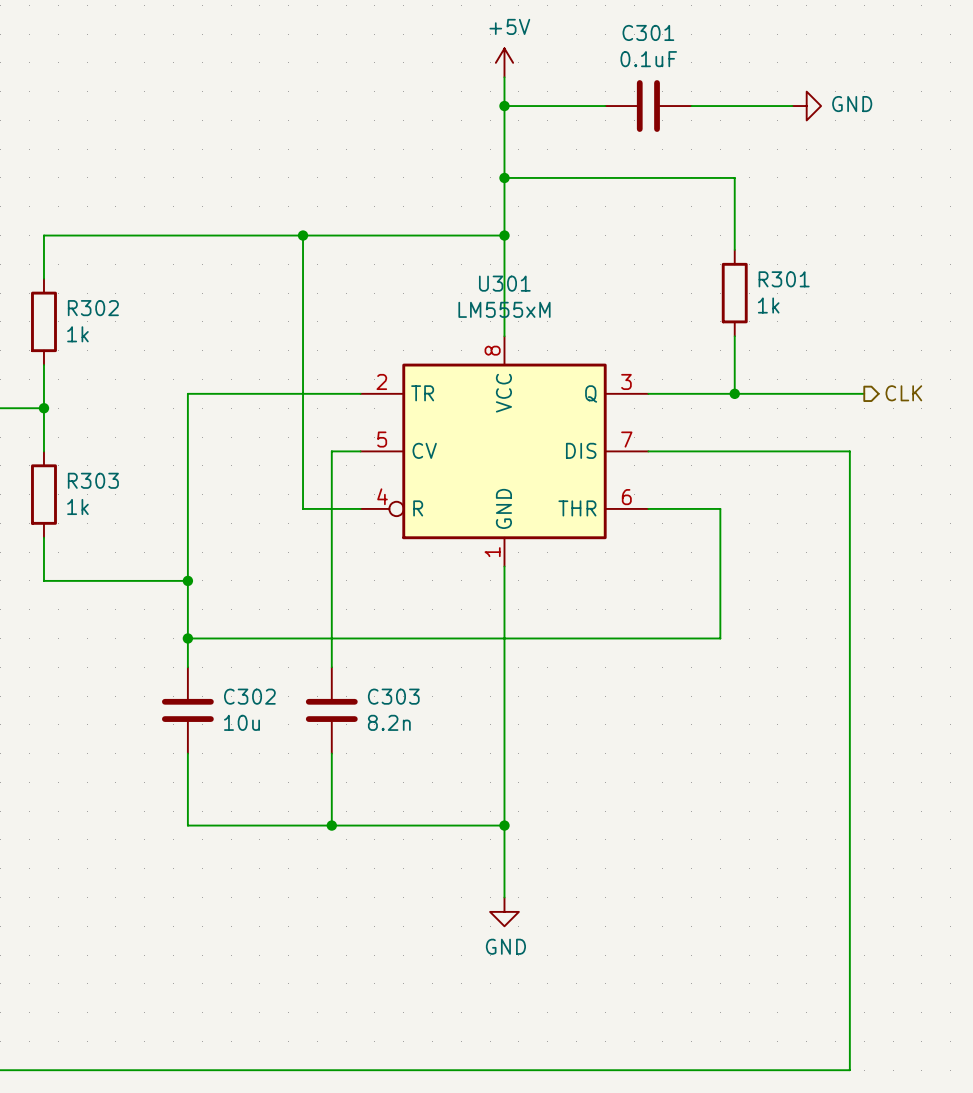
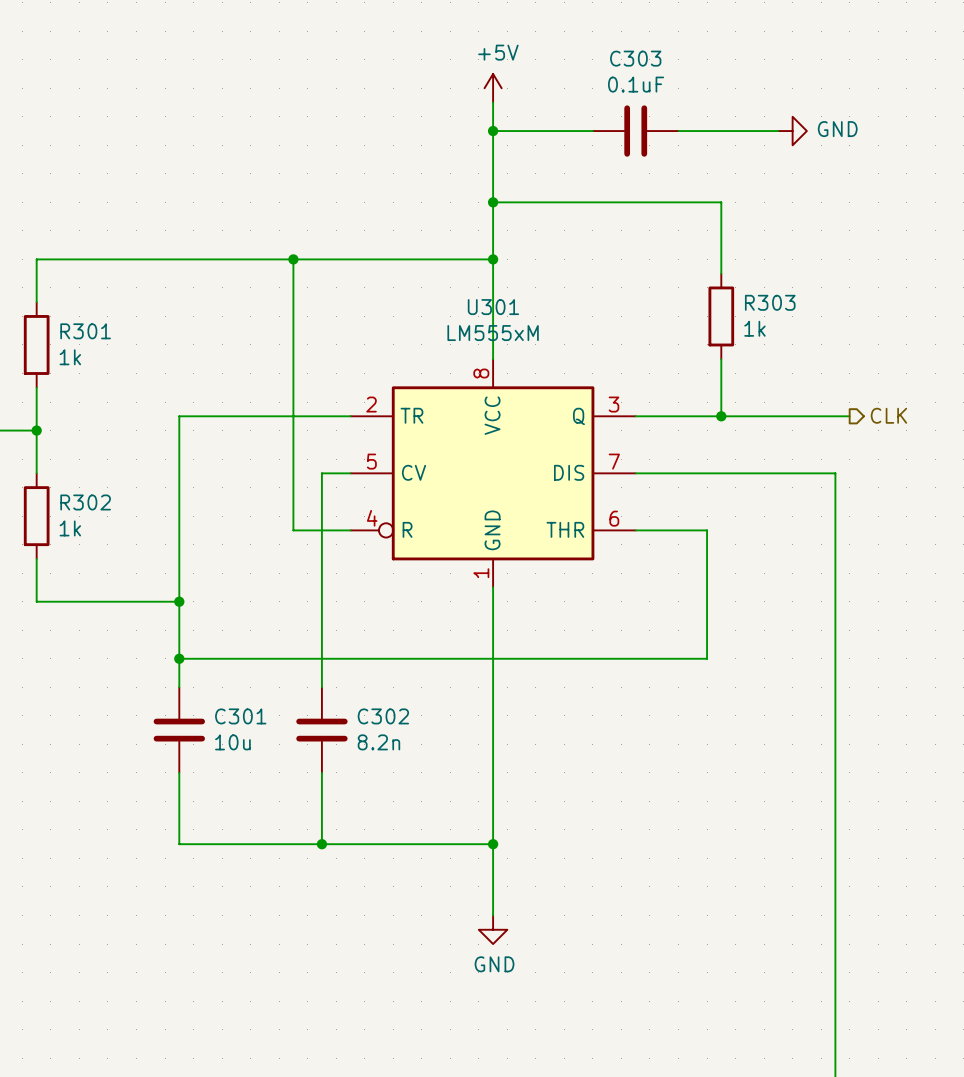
C301 name: C301 (648, 32) -> C303 (635, 58)
R301 name: R301 (784, 279) -> R303 (770, 302)
R302 name: R302 (93, 308) -> R301 (85, 331)
R303 name: R303 (93, 480) -> R302 (85, 502)
C302 name: C302 (249, 696) -> C301 (240, 716)
C303 name: C303 (393, 696) -> C302 (383, 716)

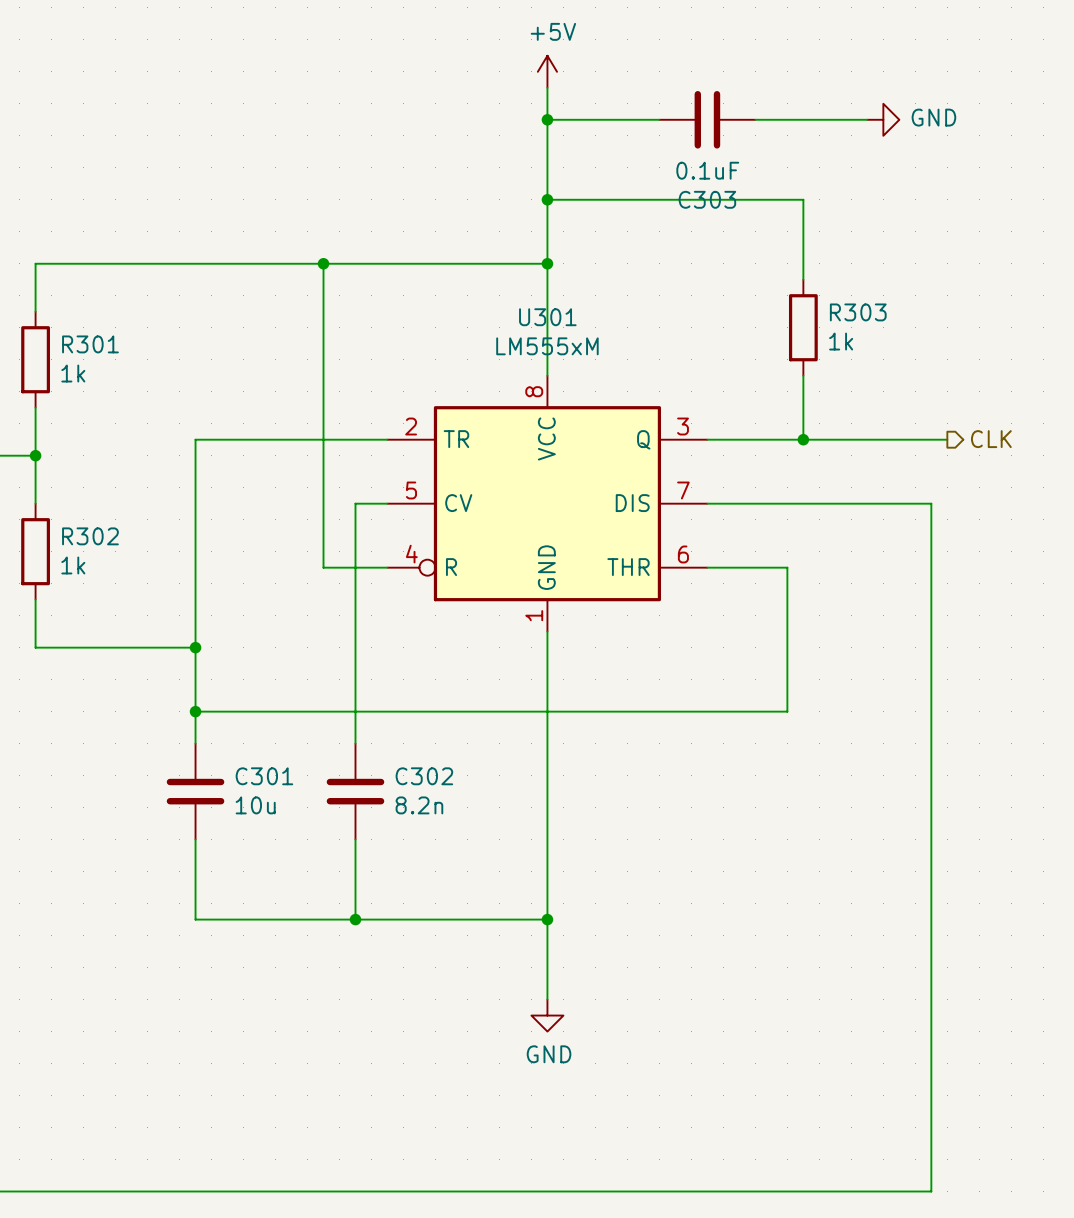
C303 name position: C303 (635, 58) -> C303 (707, 199)
C303 value position: 0.1uF (636, 84) -> 0.1uF (707, 170)

